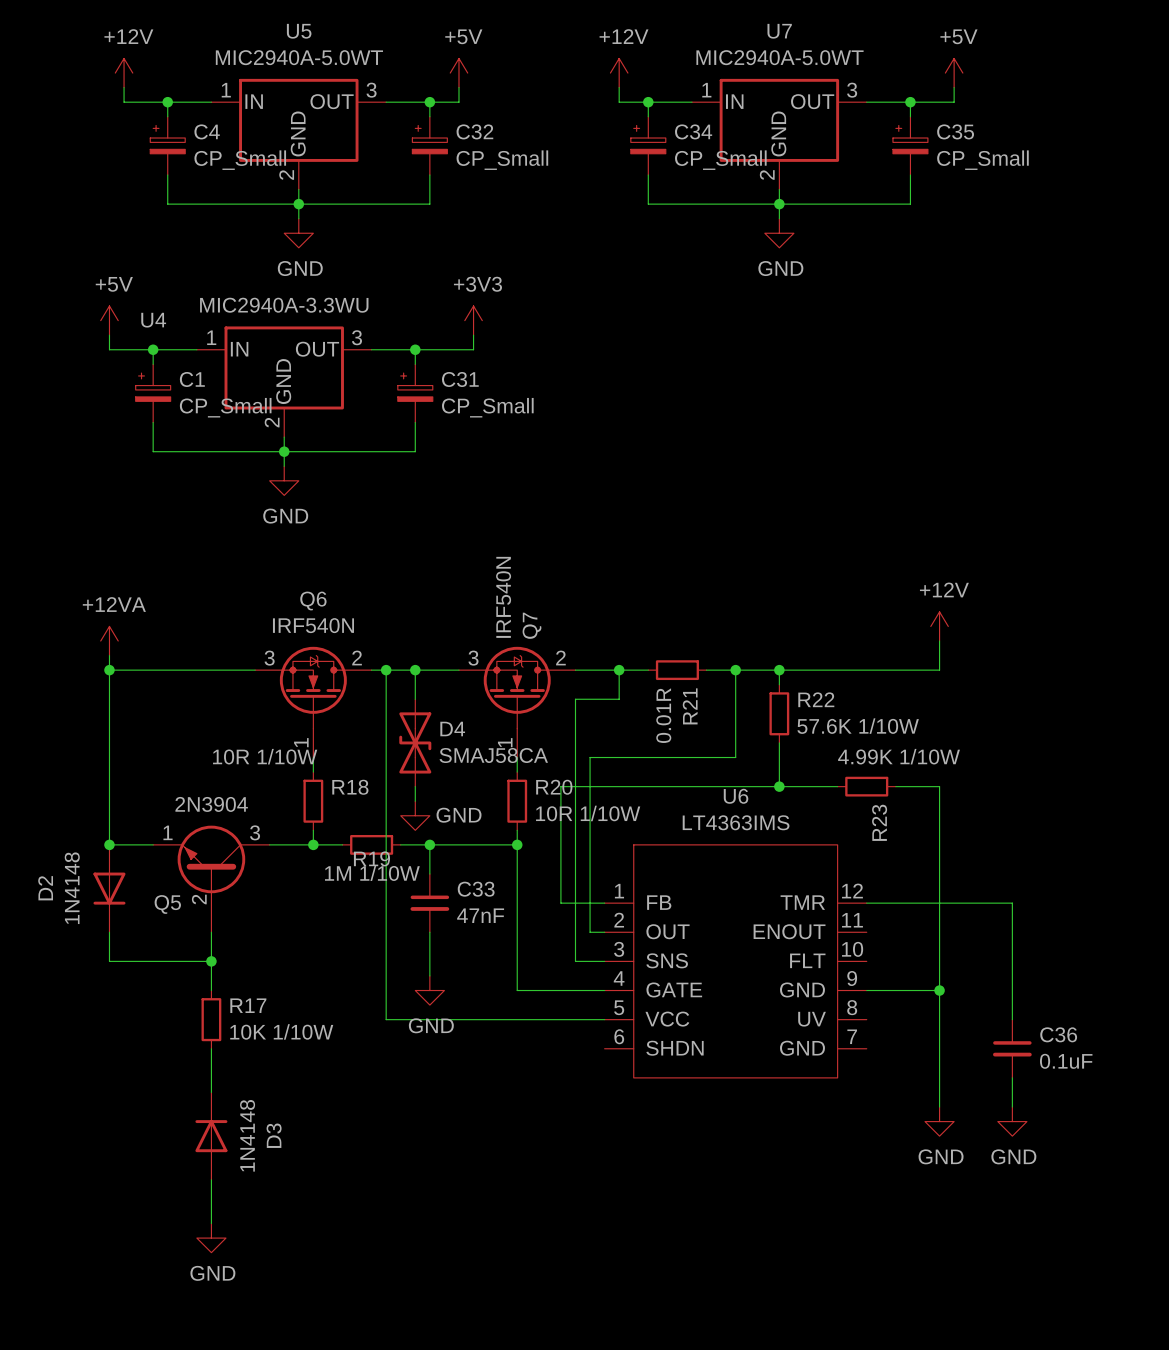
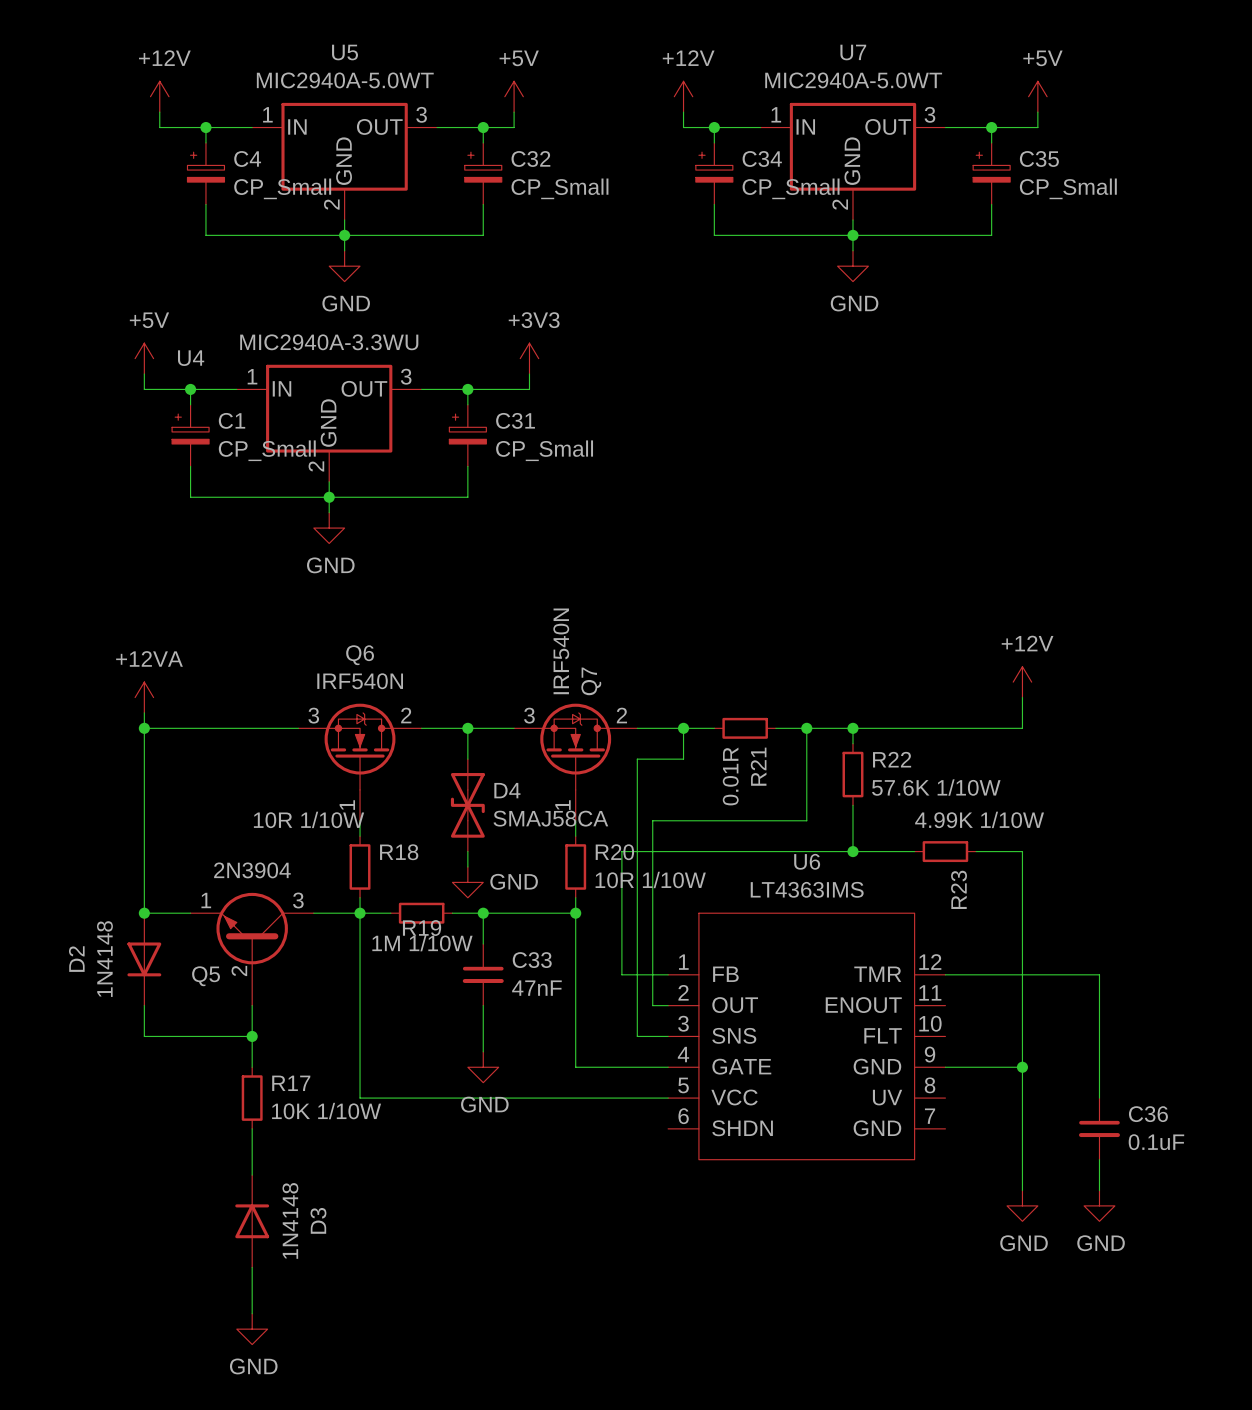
wire: (386, 670) (386, 1019) -> (360, 913) (360, 1098) (437, 1098)
junction: (386, 670) -> none

